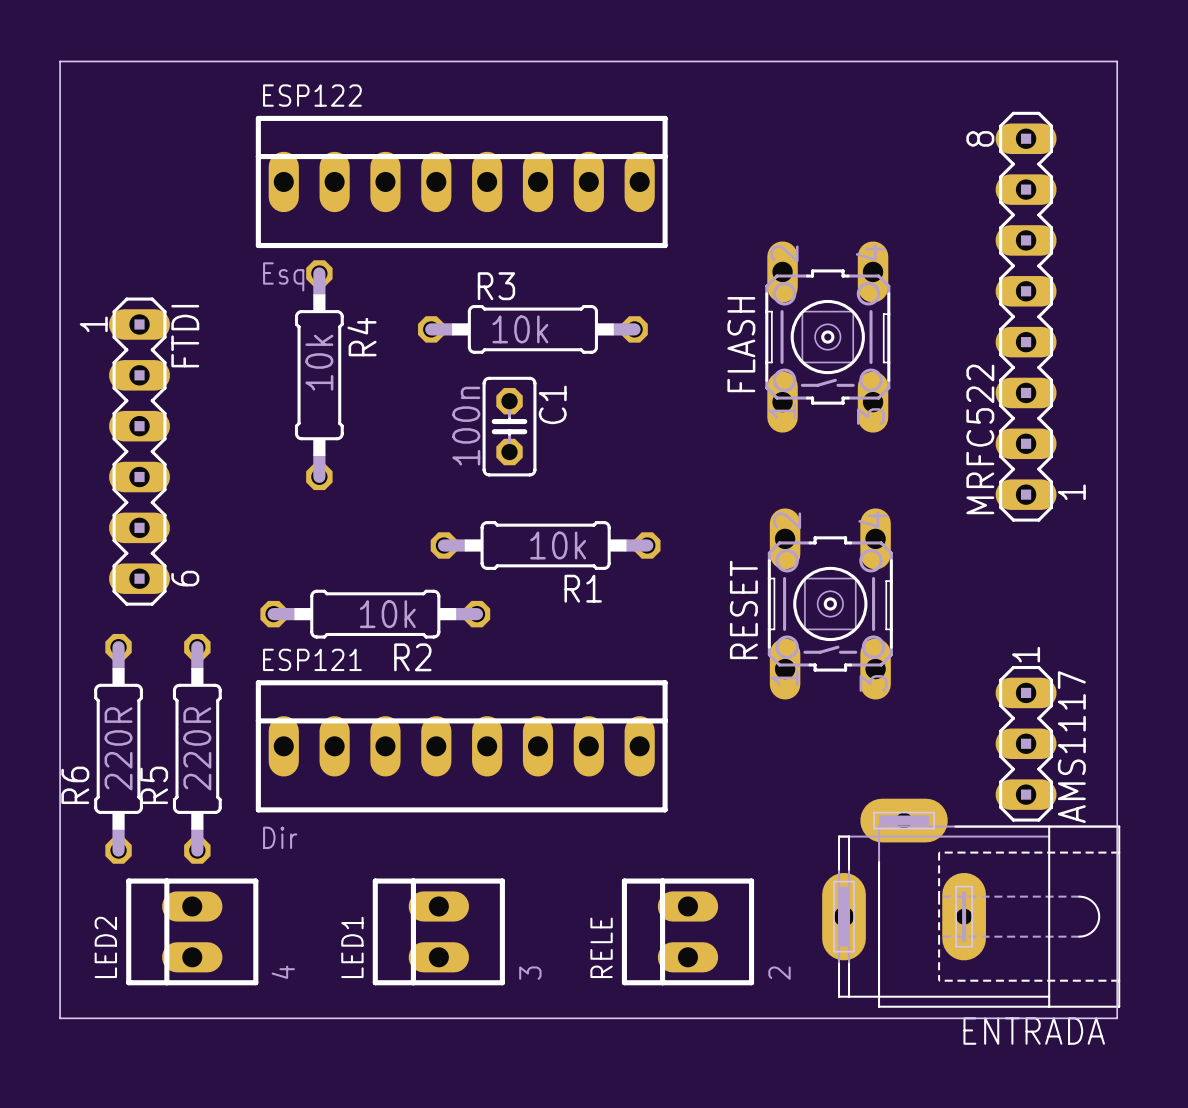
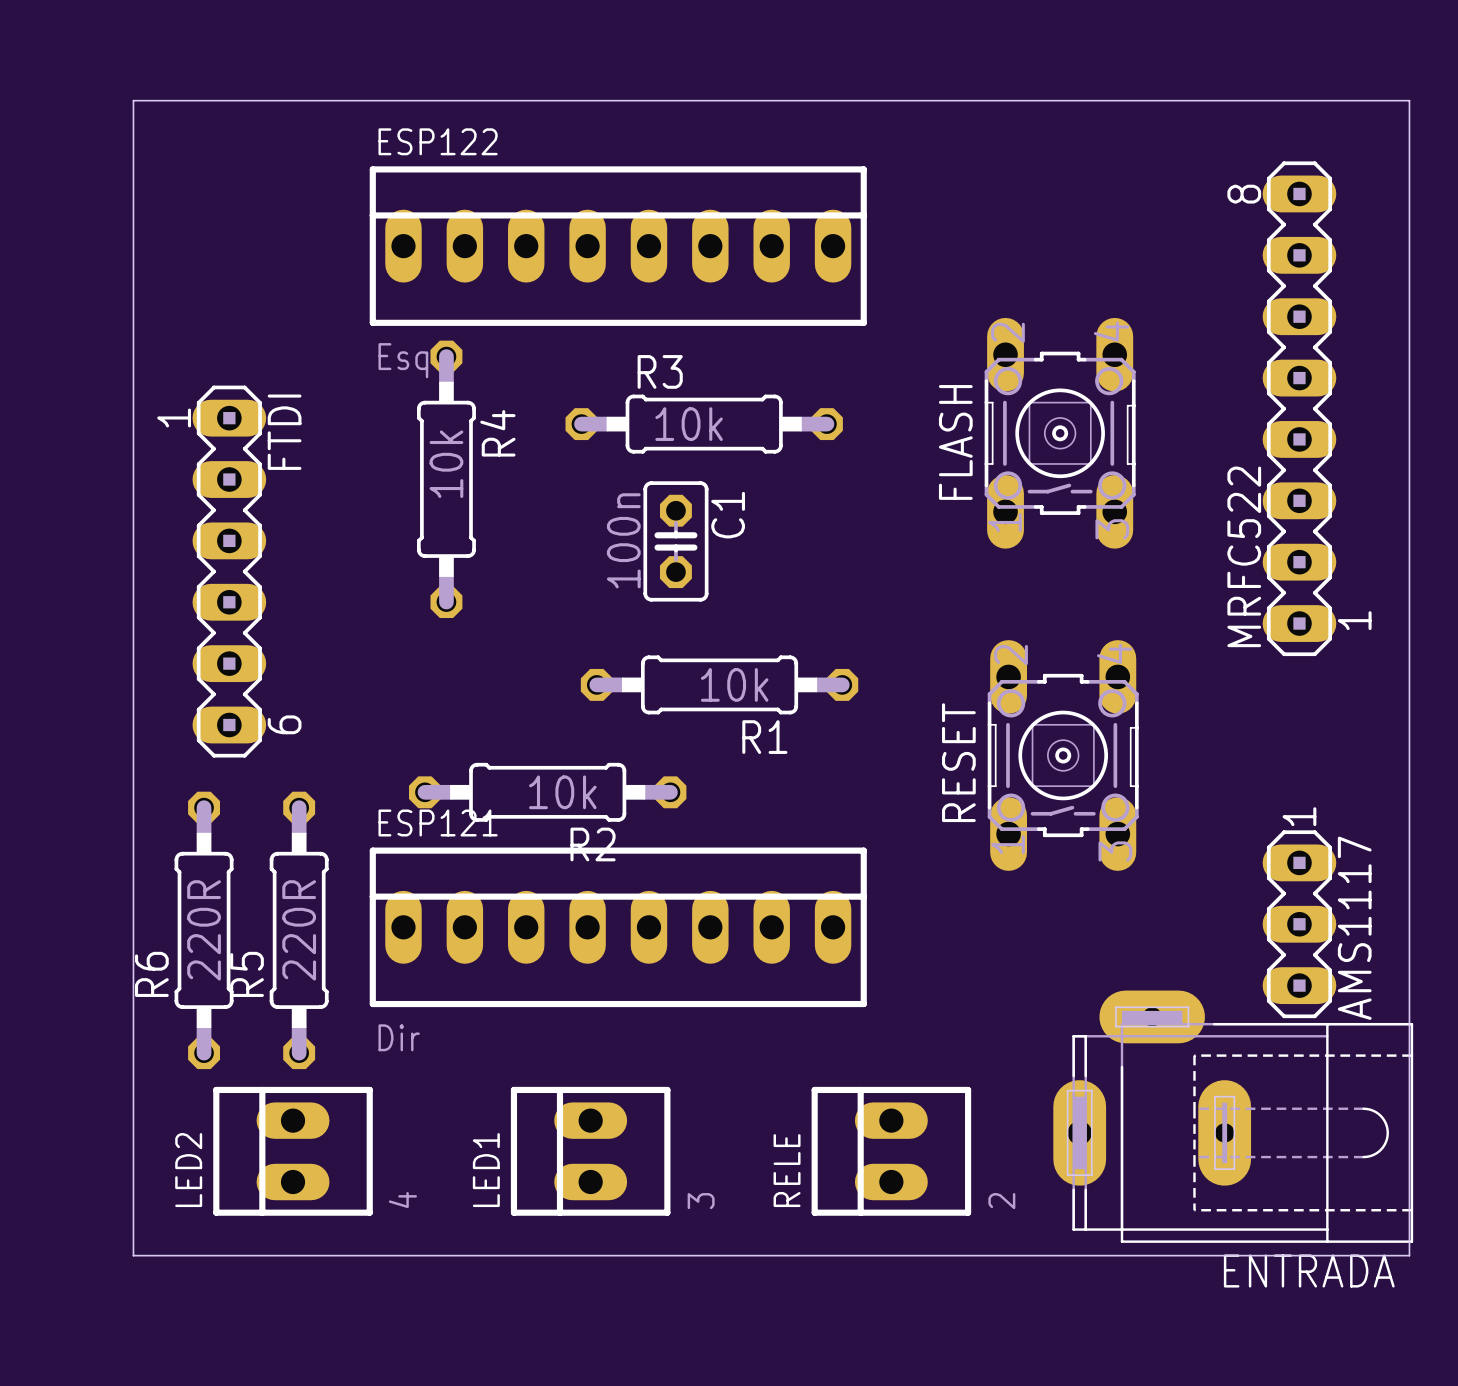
R2 position: (375, 614) -> (547, 792)

